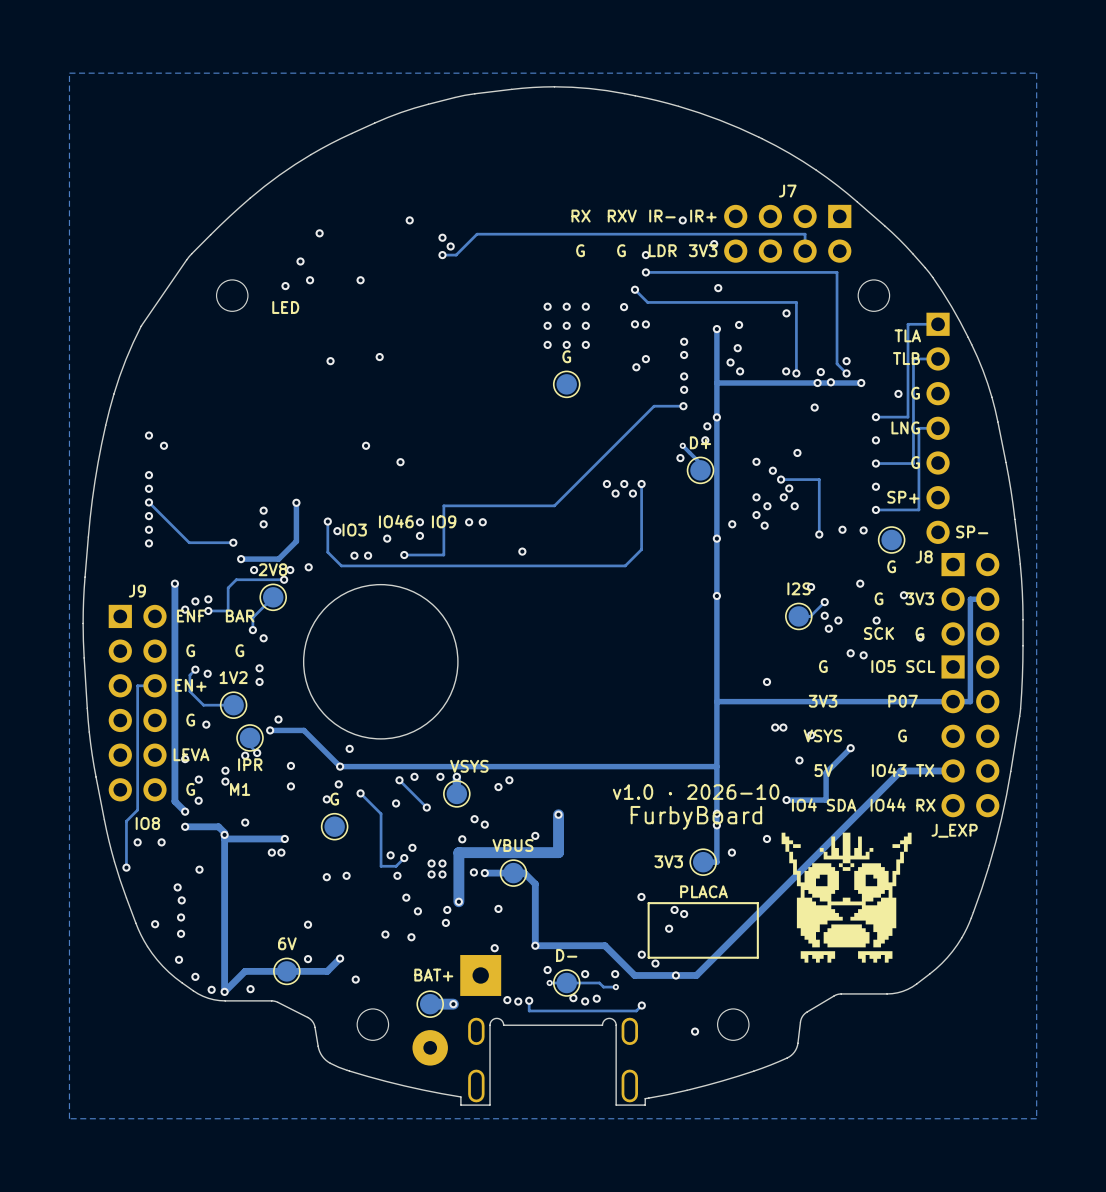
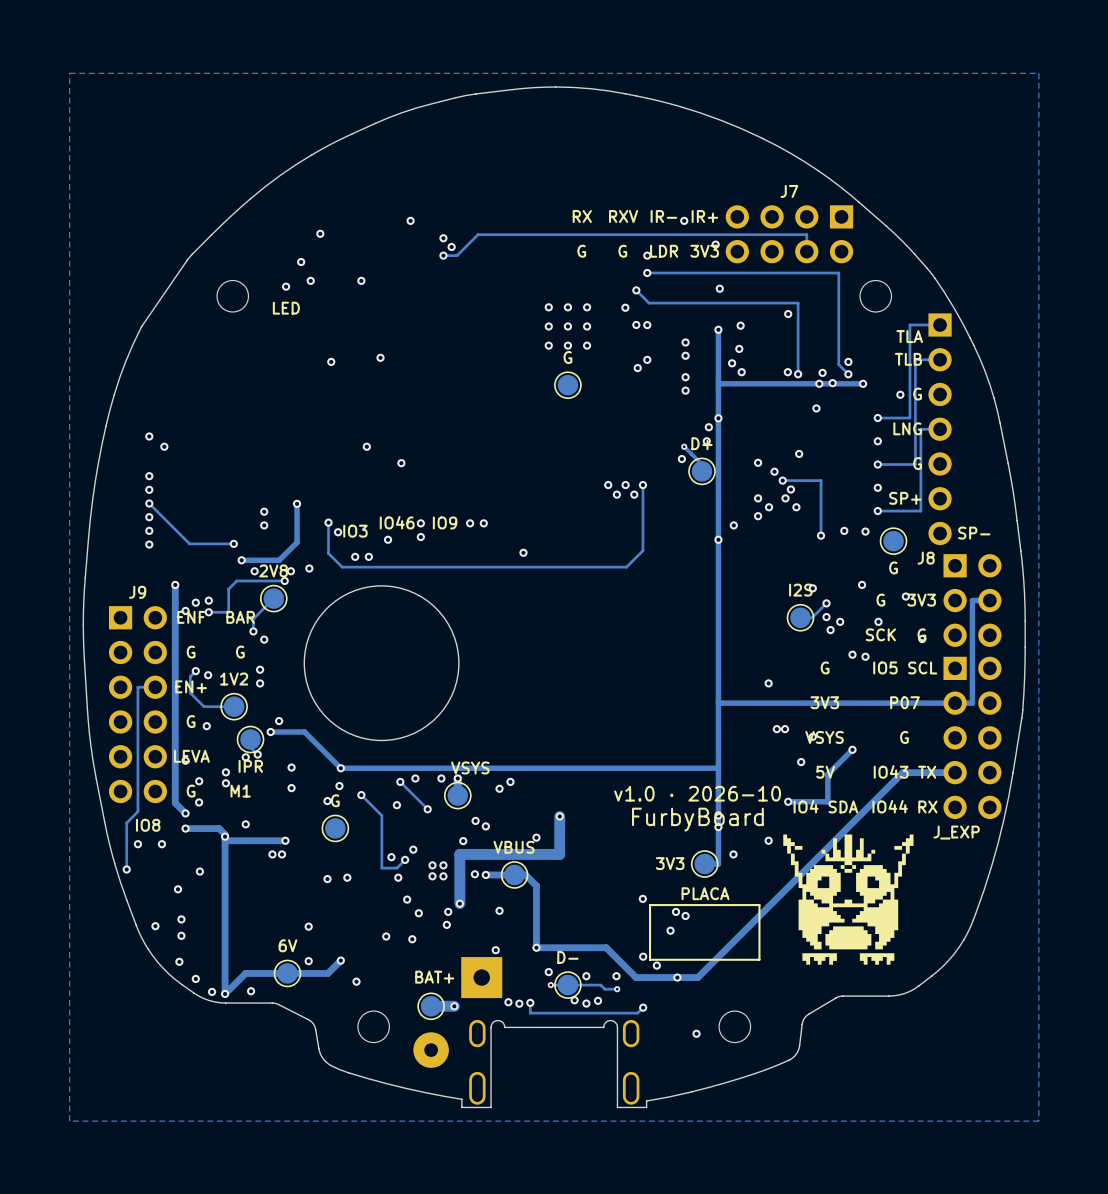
track: (683, 406) (654, 406) (554, 505) (443, 505) (443, 555) (404, 555) -> none
via: (683, 406) -> none
via: (764, 525) -> none
via: (404, 555) -> none
via: (716, 595) -> none
via: (349, 748) -> none
via: (181, 900) -> none

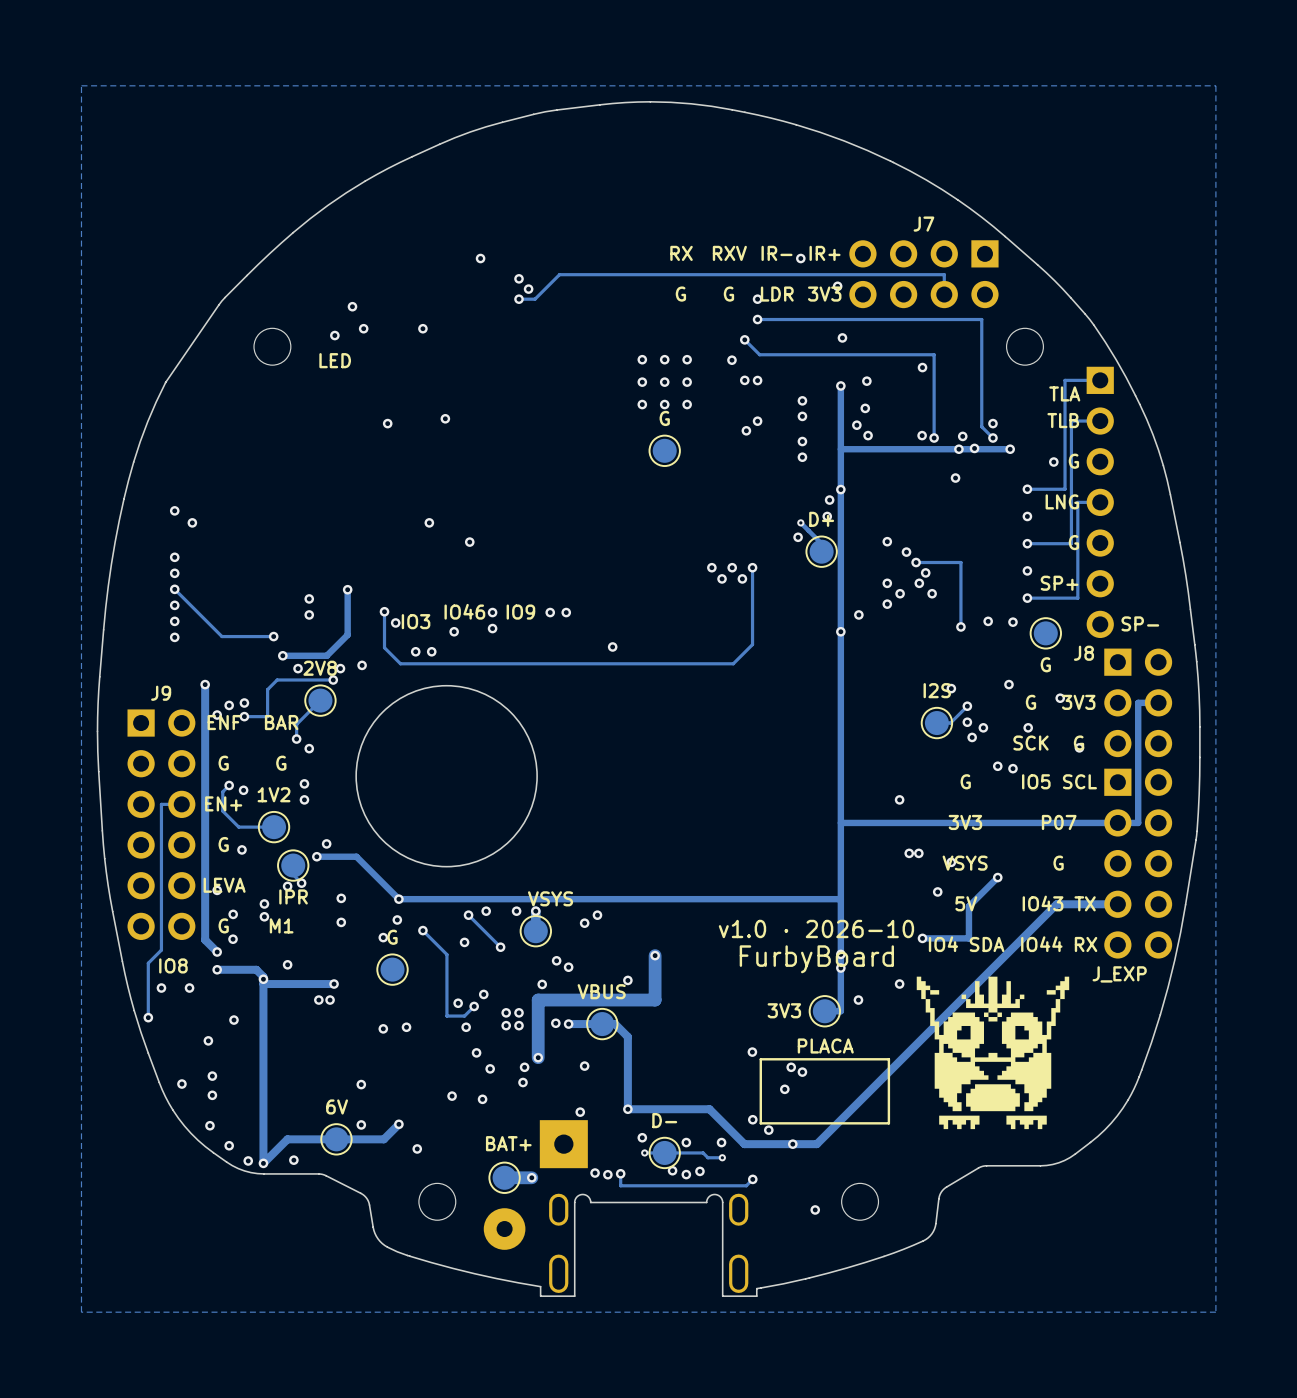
via: (320, 233) -> none
via: (799, 453) -> none

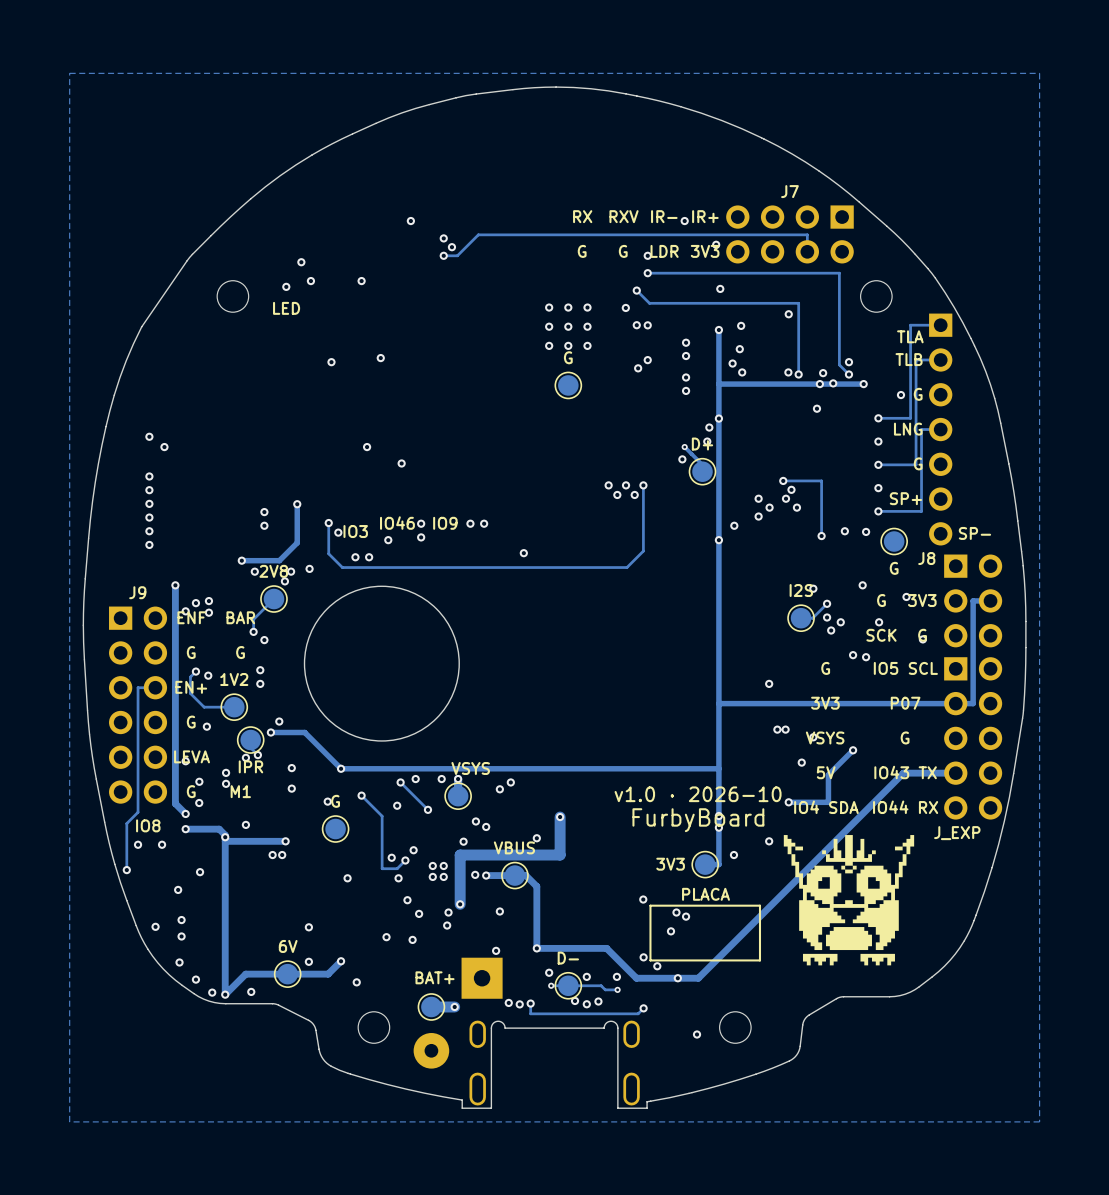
via: (887, 541) -> none
via: (906, 552) -> none
track: (174, 589) (221, 636) (273, 636) -> none
via: (273, 636) -> none
track: (333, 679) (277, 679) (267, 689) (267, 716) (244, 716) -> none
via: (397, 919) -> none
via: (383, 1028) -> none

